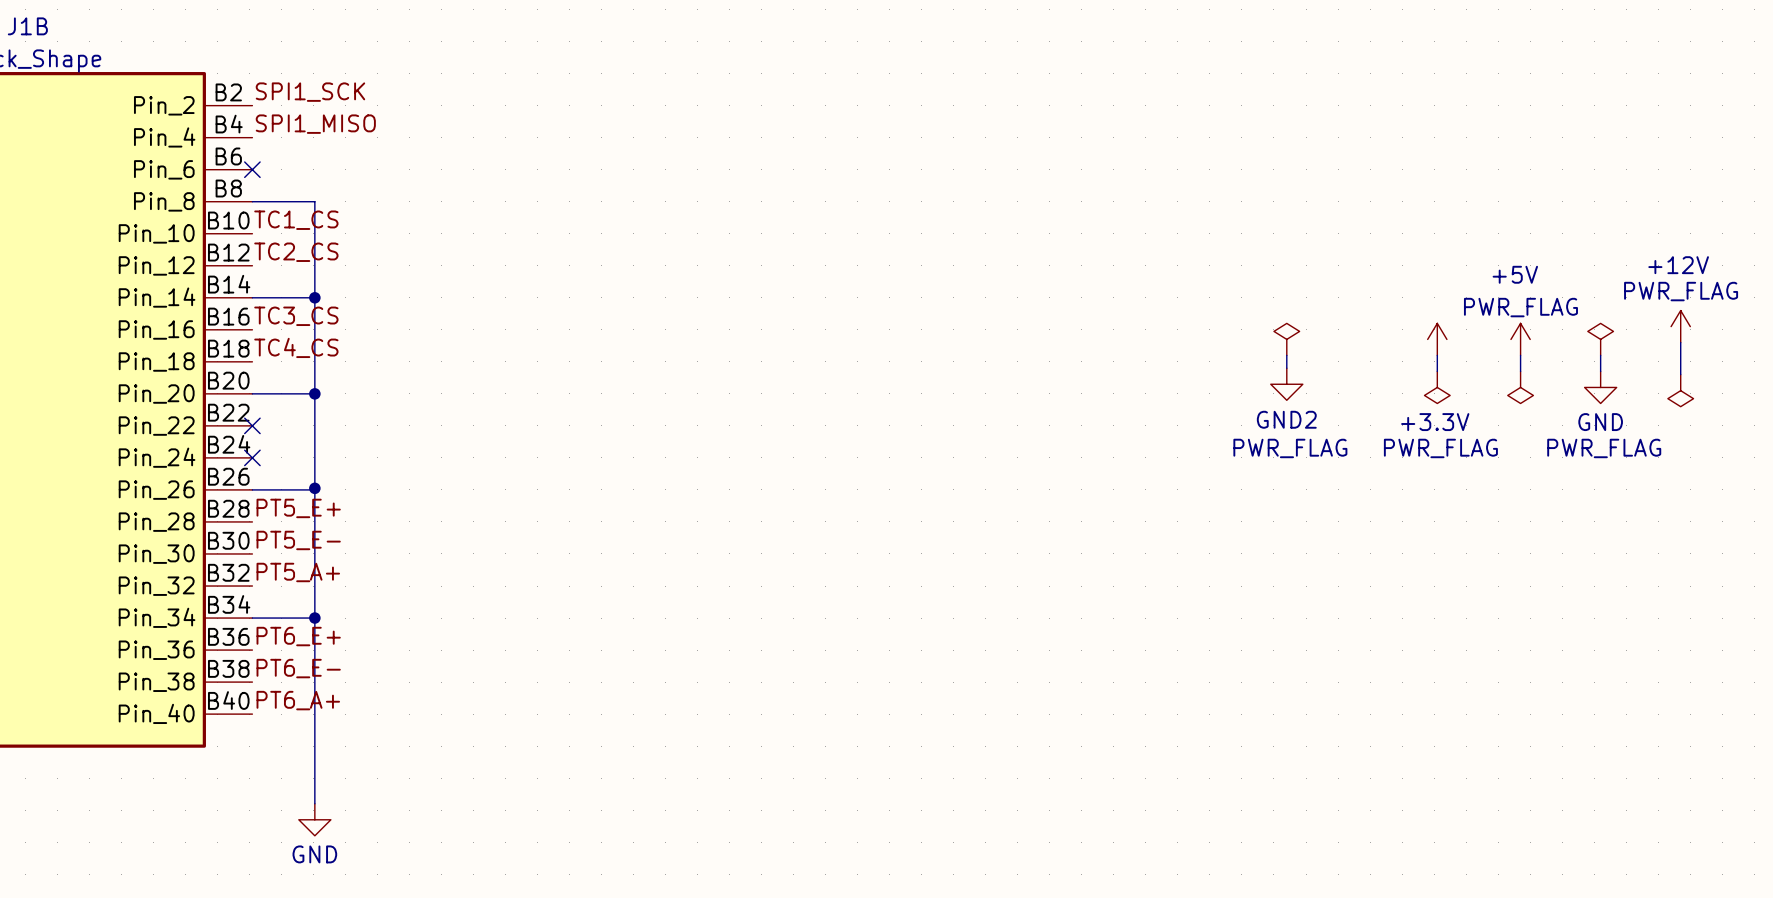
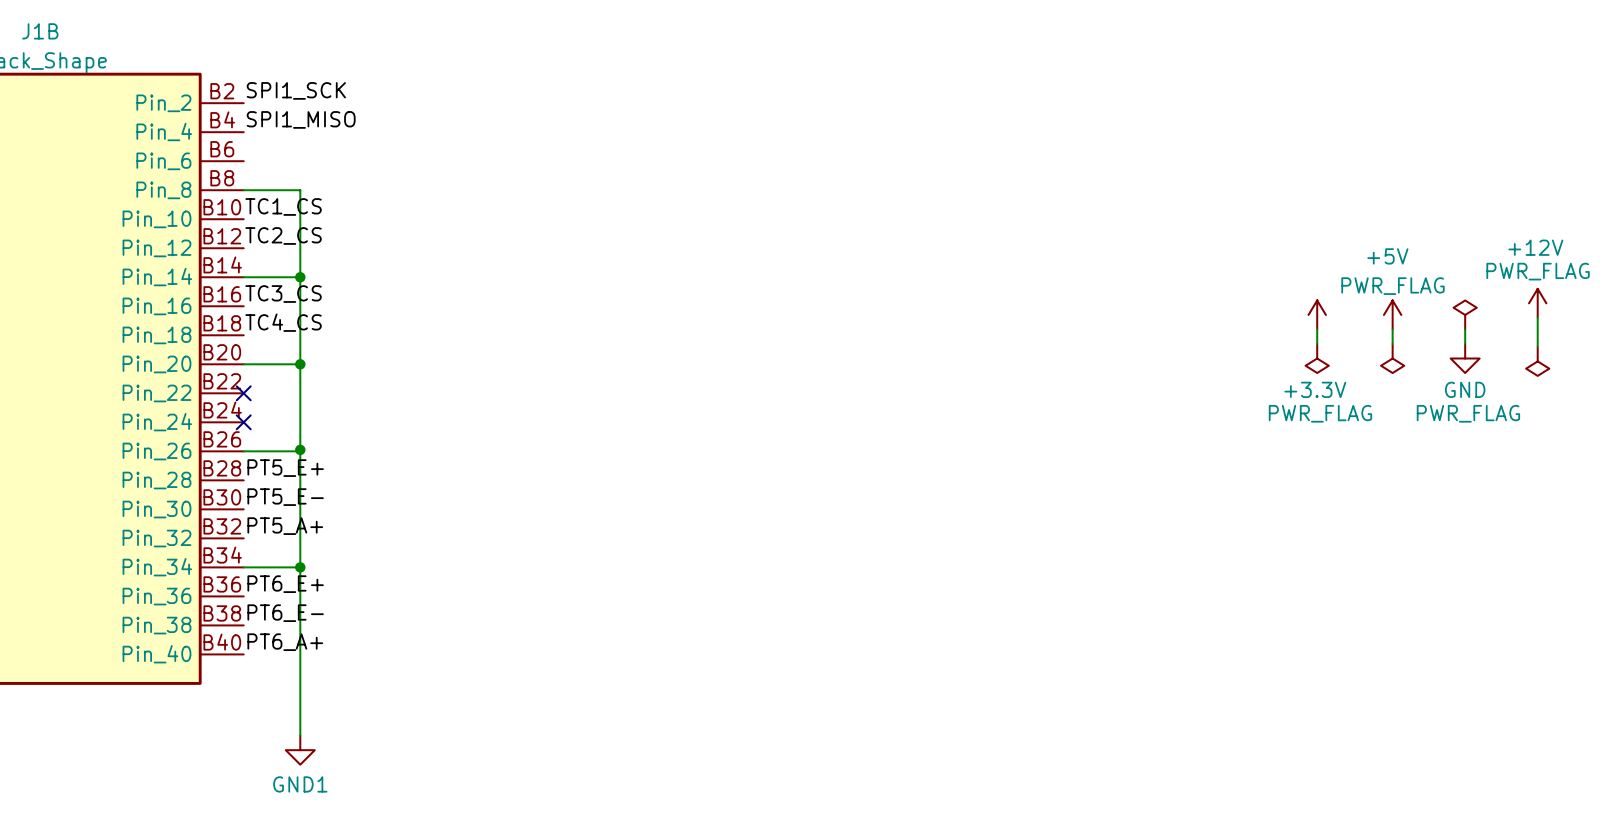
no-connect mark: (252, 169) -> none
power symbol: PWR_FLAG (1286, 339) -> none
wire: (1286, 355) (1286, 368) -> none
power symbol: GND2 (1286, 384) -> none
power symbol: GND (314, 819) -> GND1 (300, 750)

